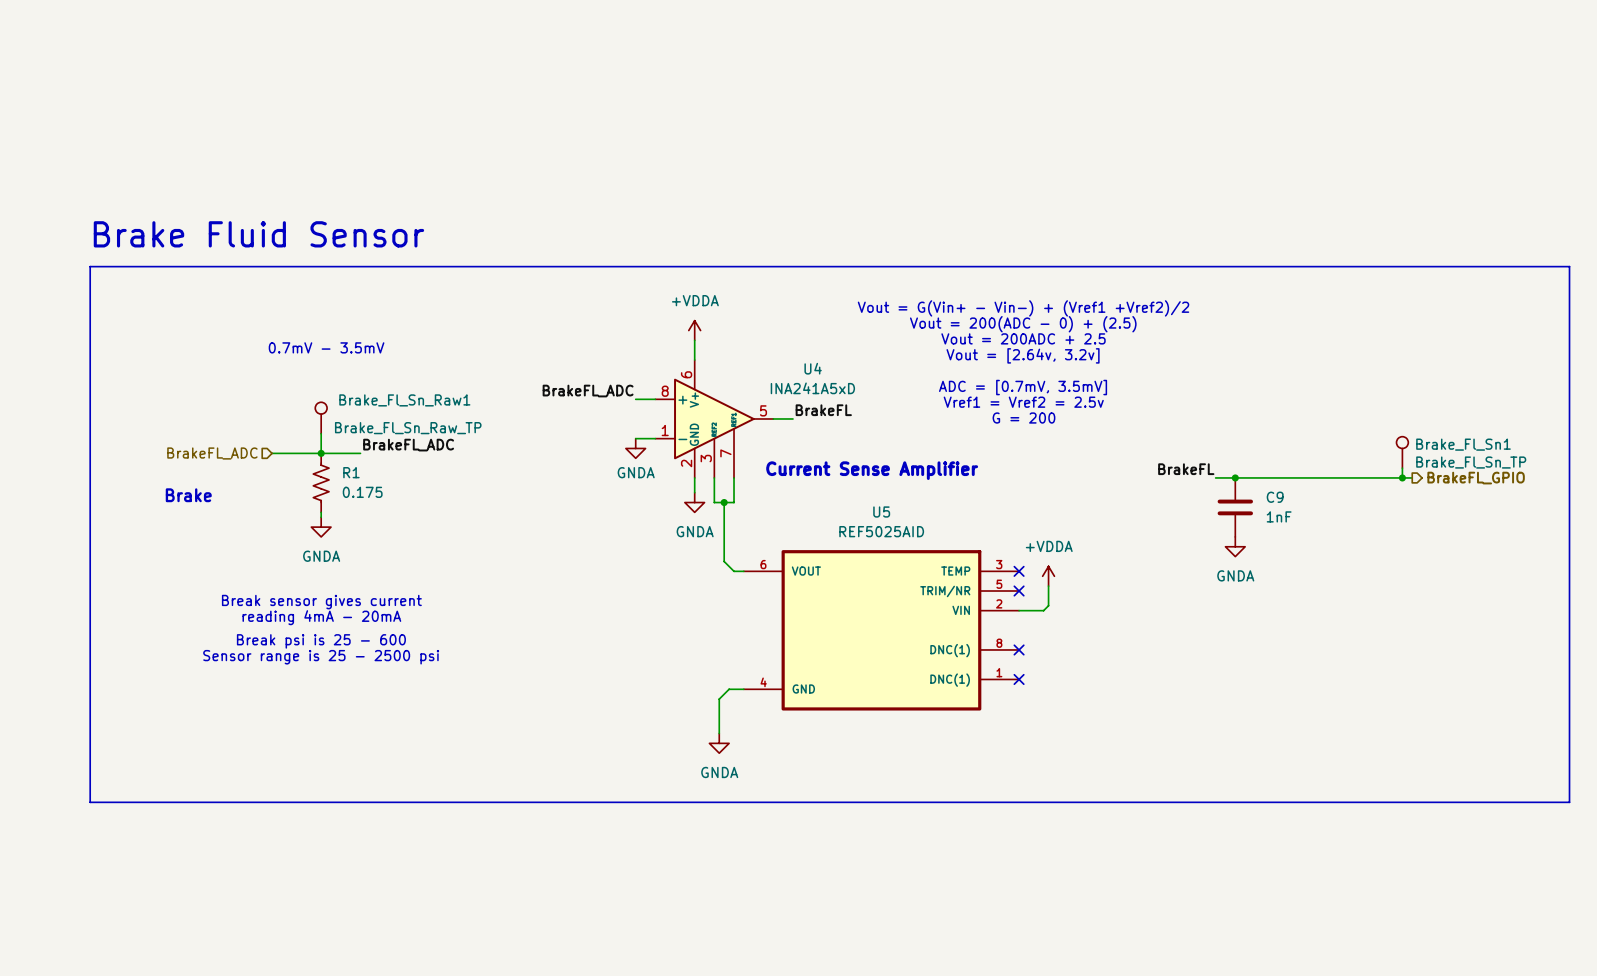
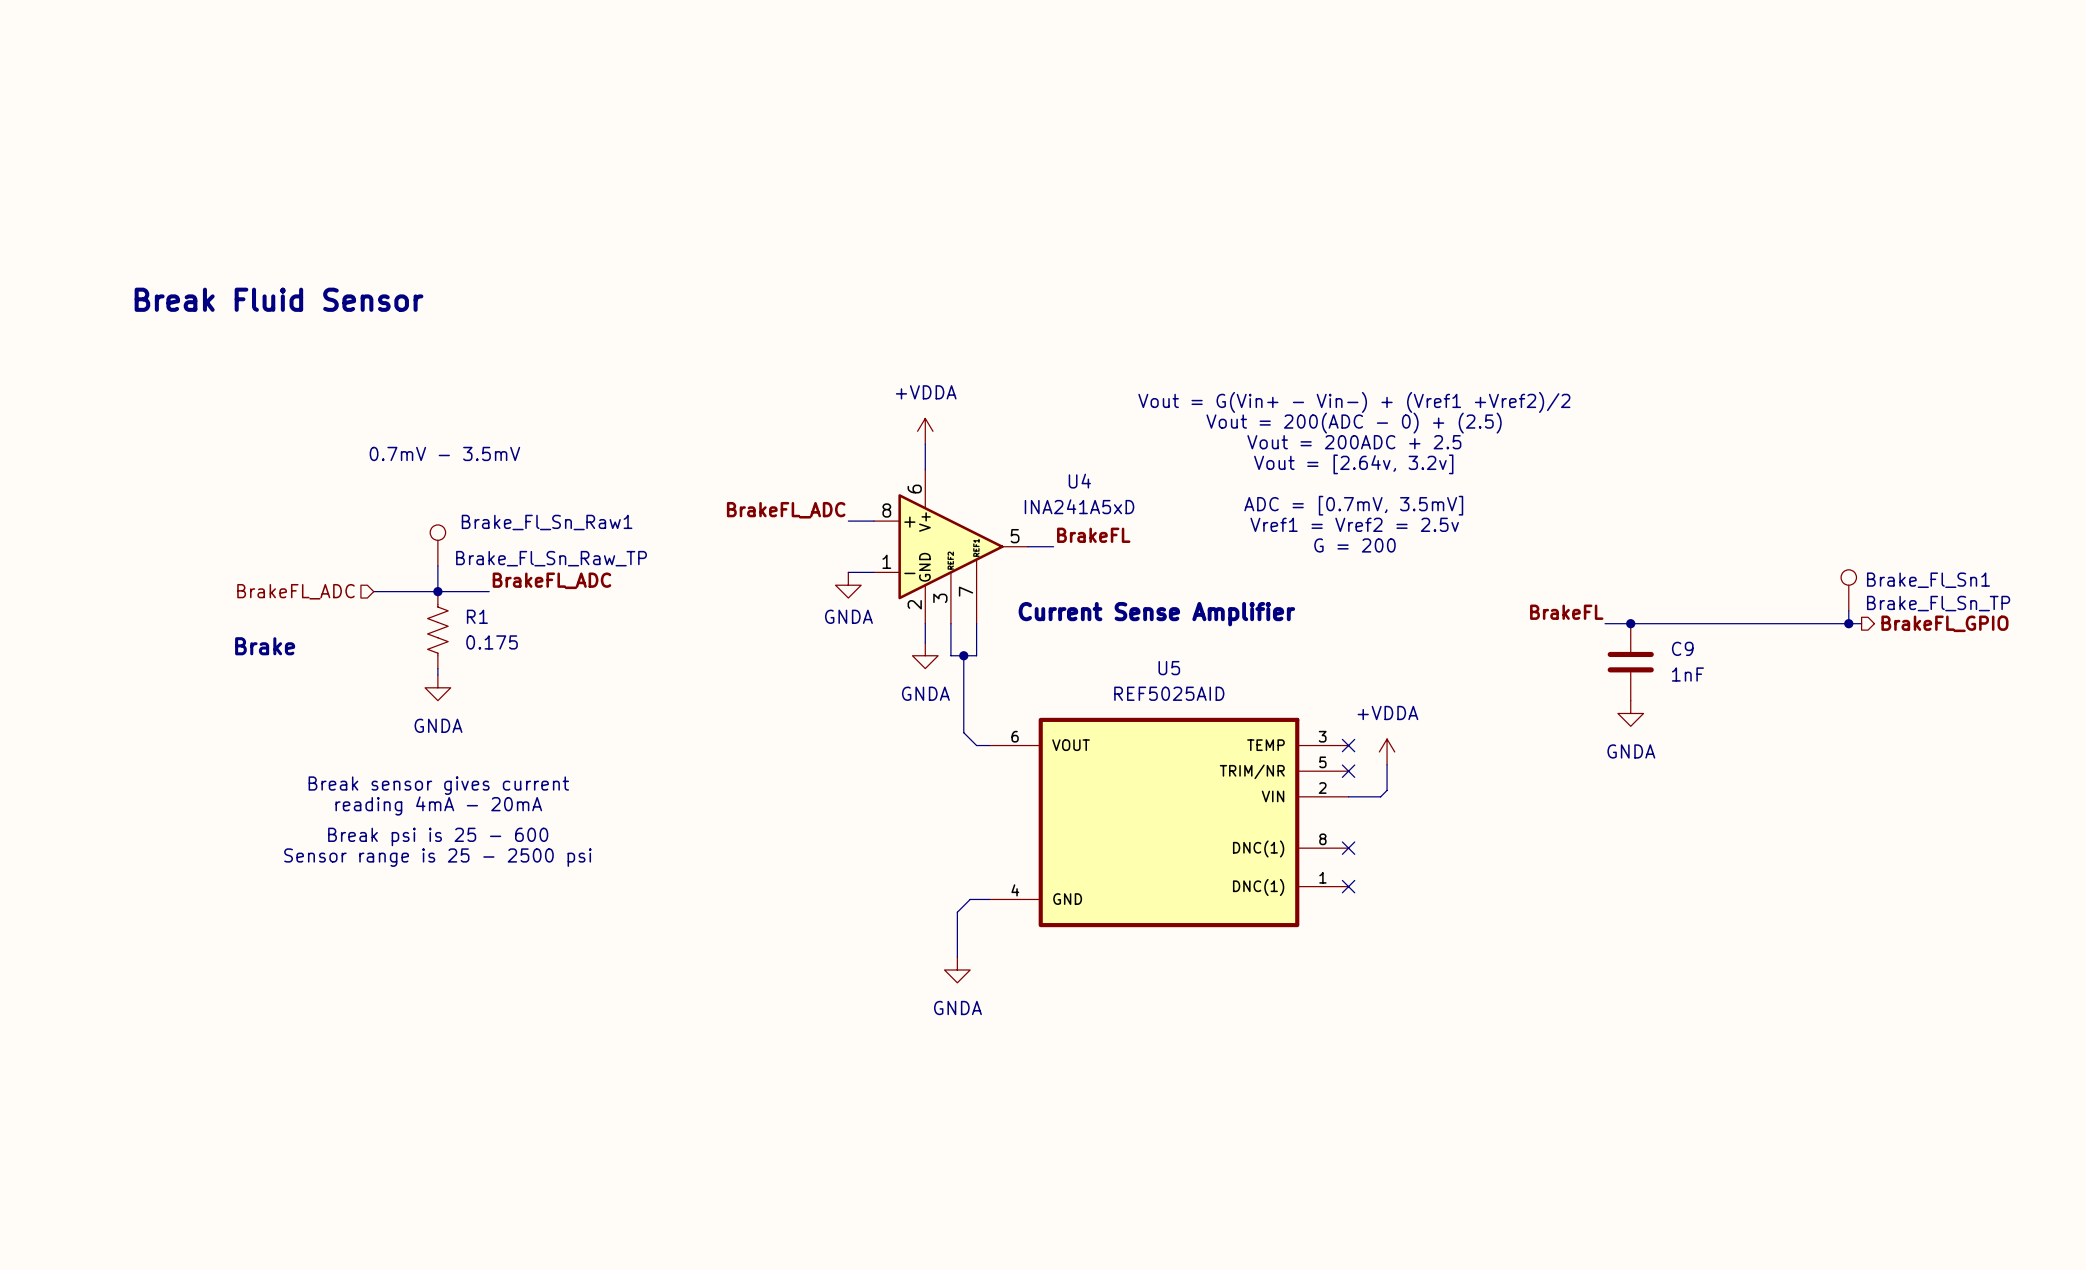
text: Brake Fluid Sensor (258, 234) -> Break Fluid Sensor (279, 299)
line: (90, 266) (1569, 266) (1569, 802) (90, 802) (90, 266) -> none

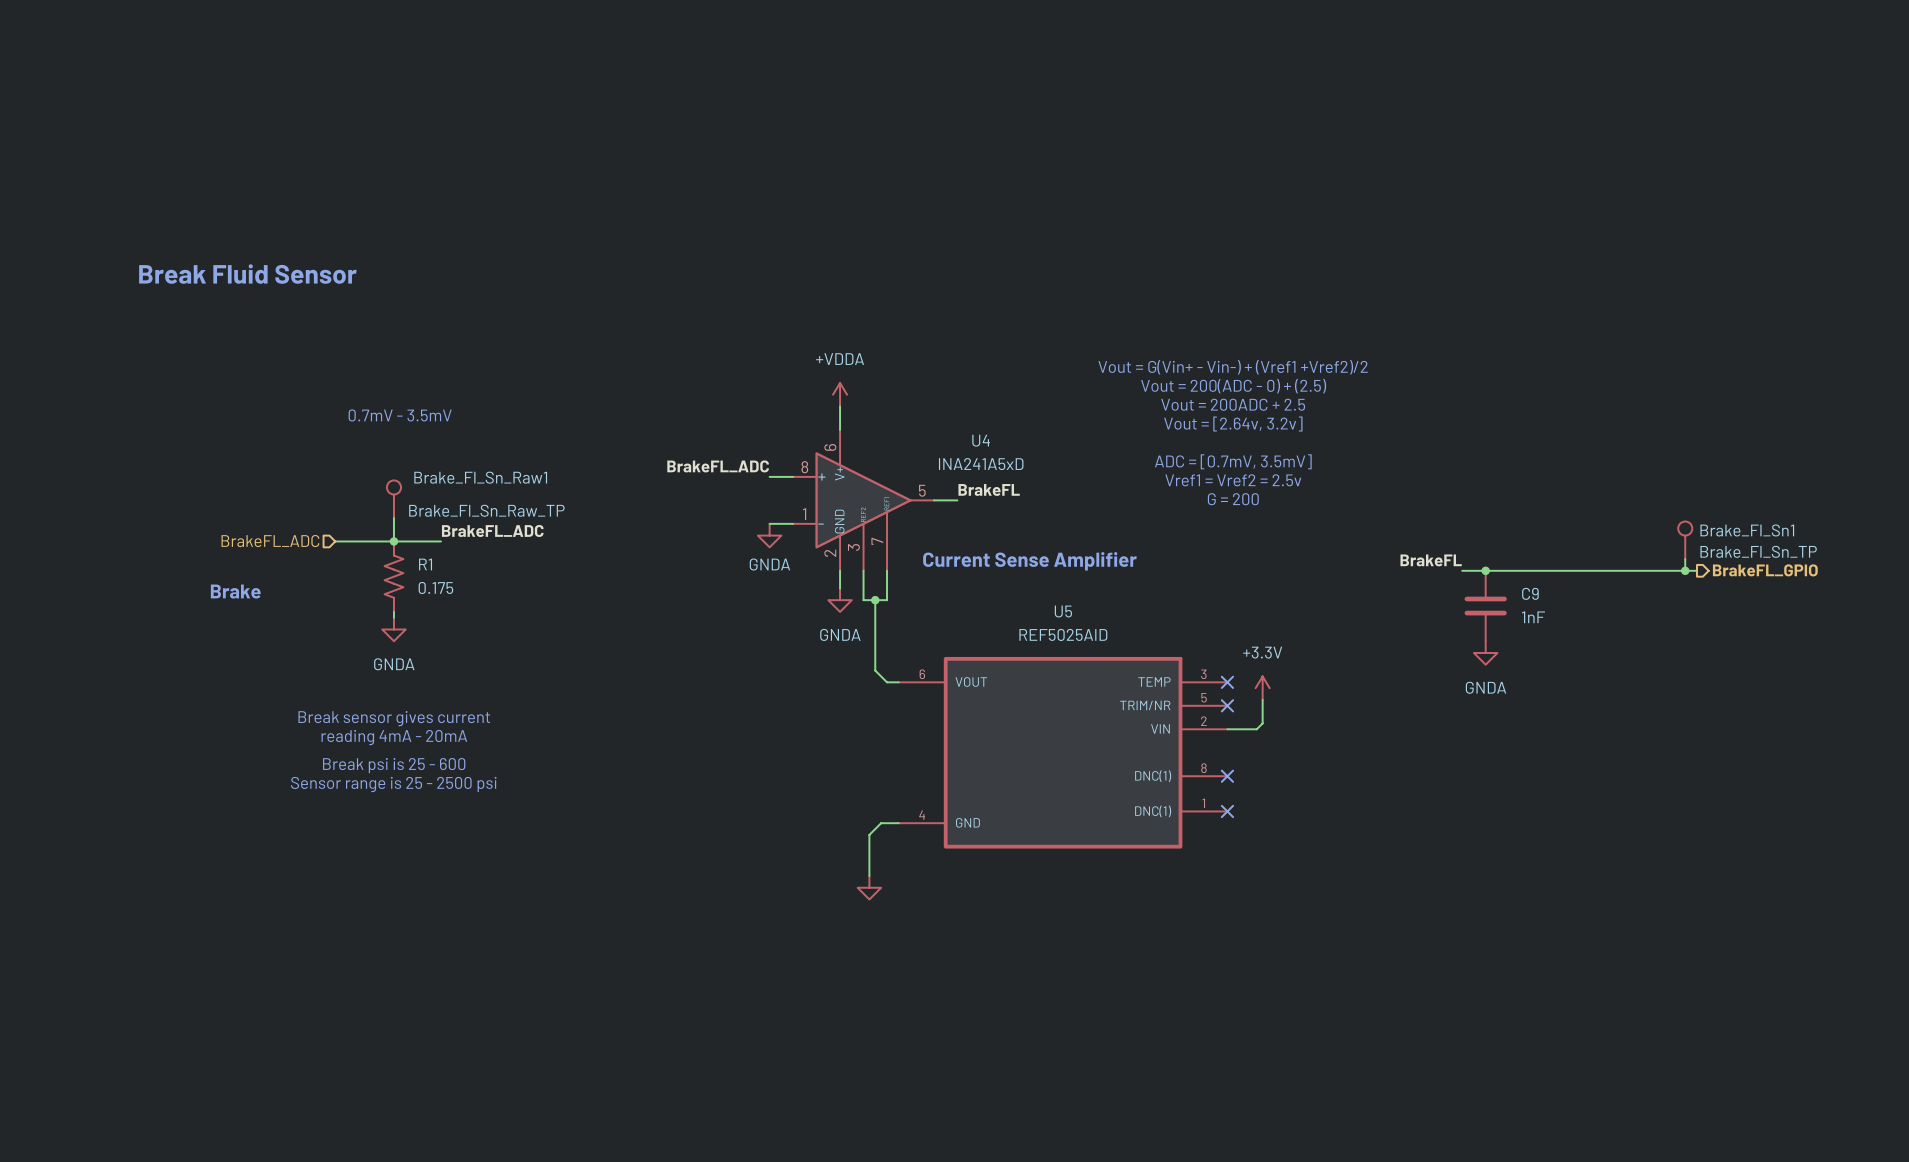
power symbol: +VDDA (1387, 751) -> +3.3V (1262, 688)
power symbol text: GNDA (957, 1008) -> none

